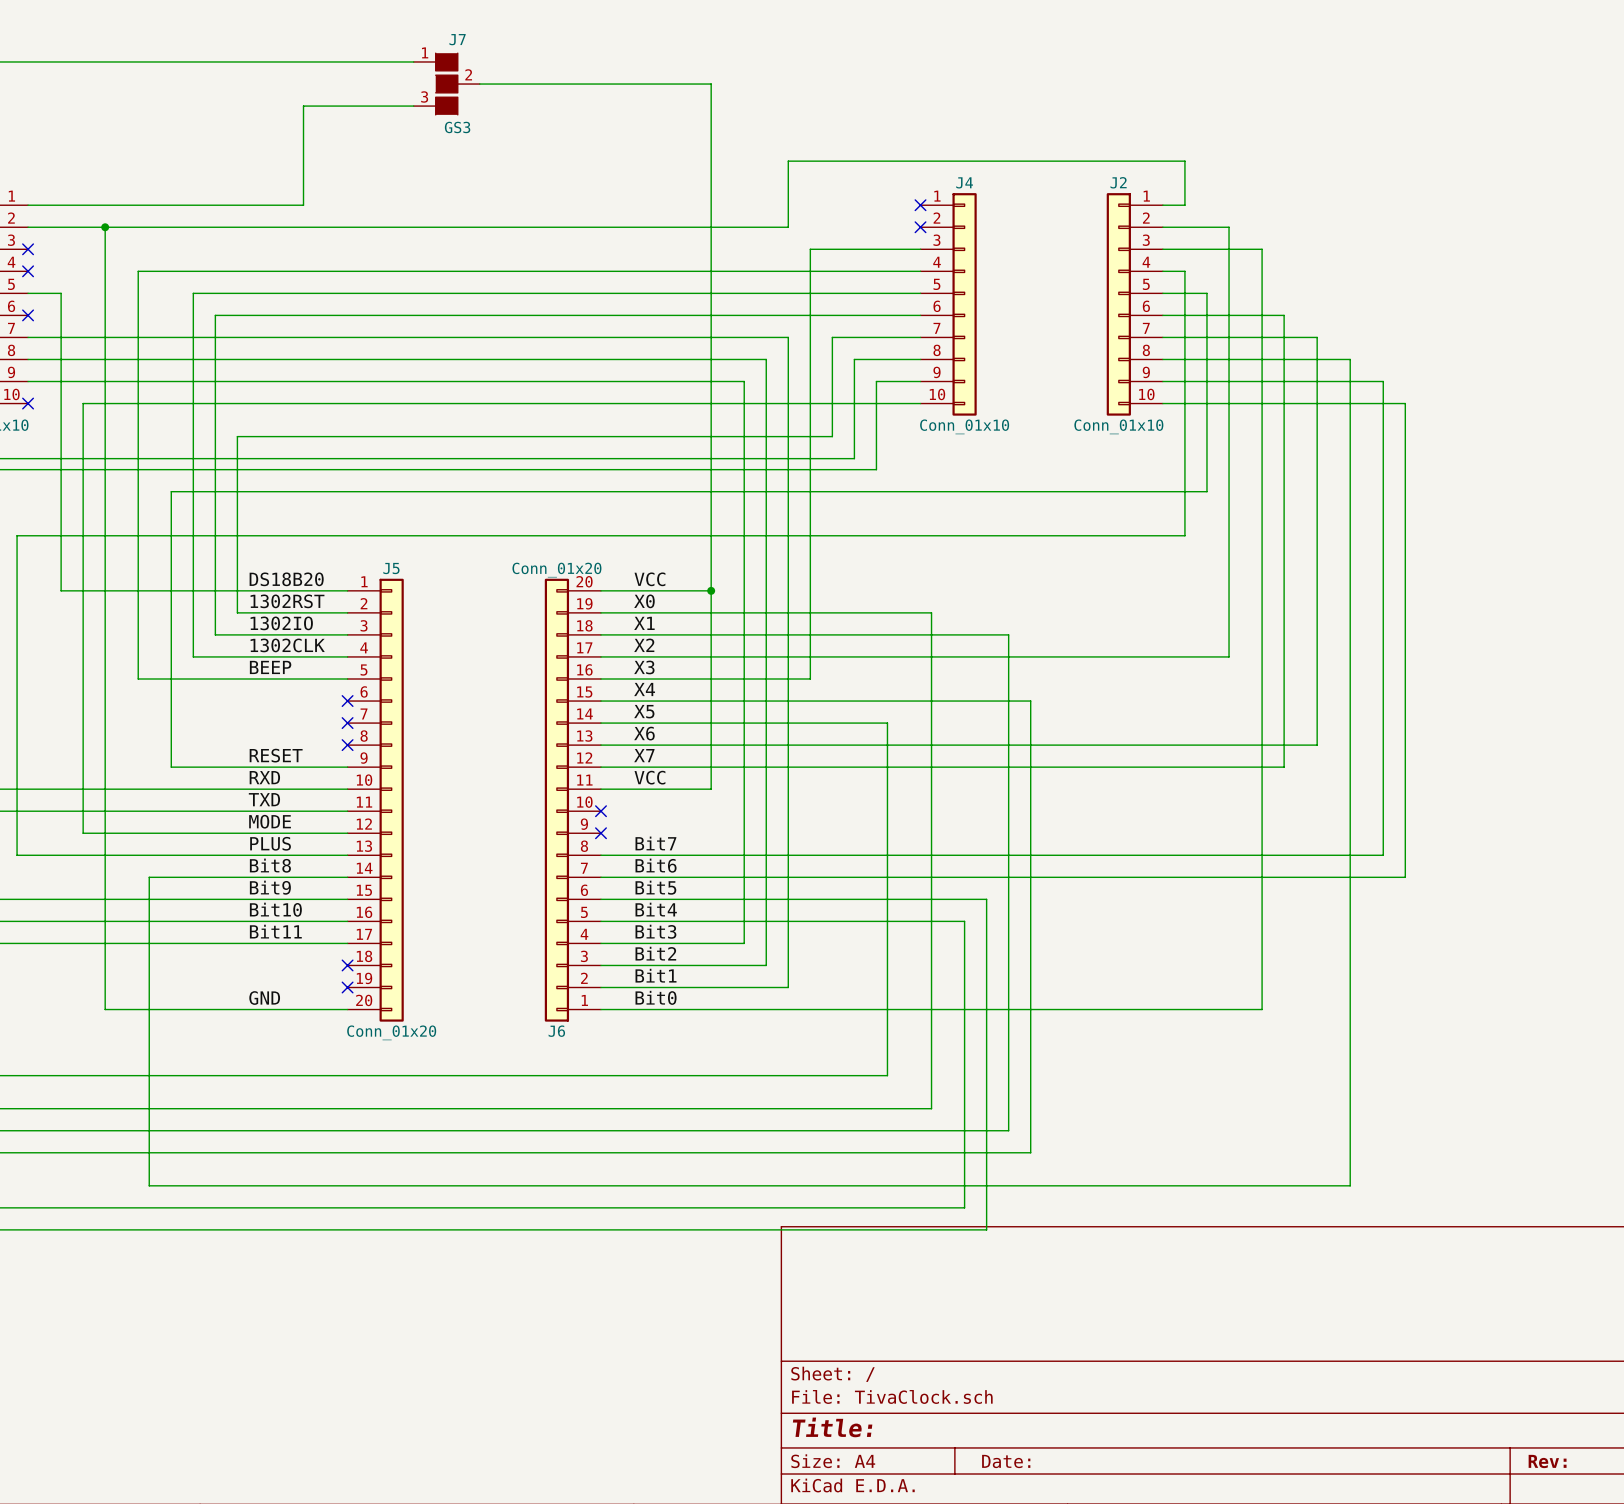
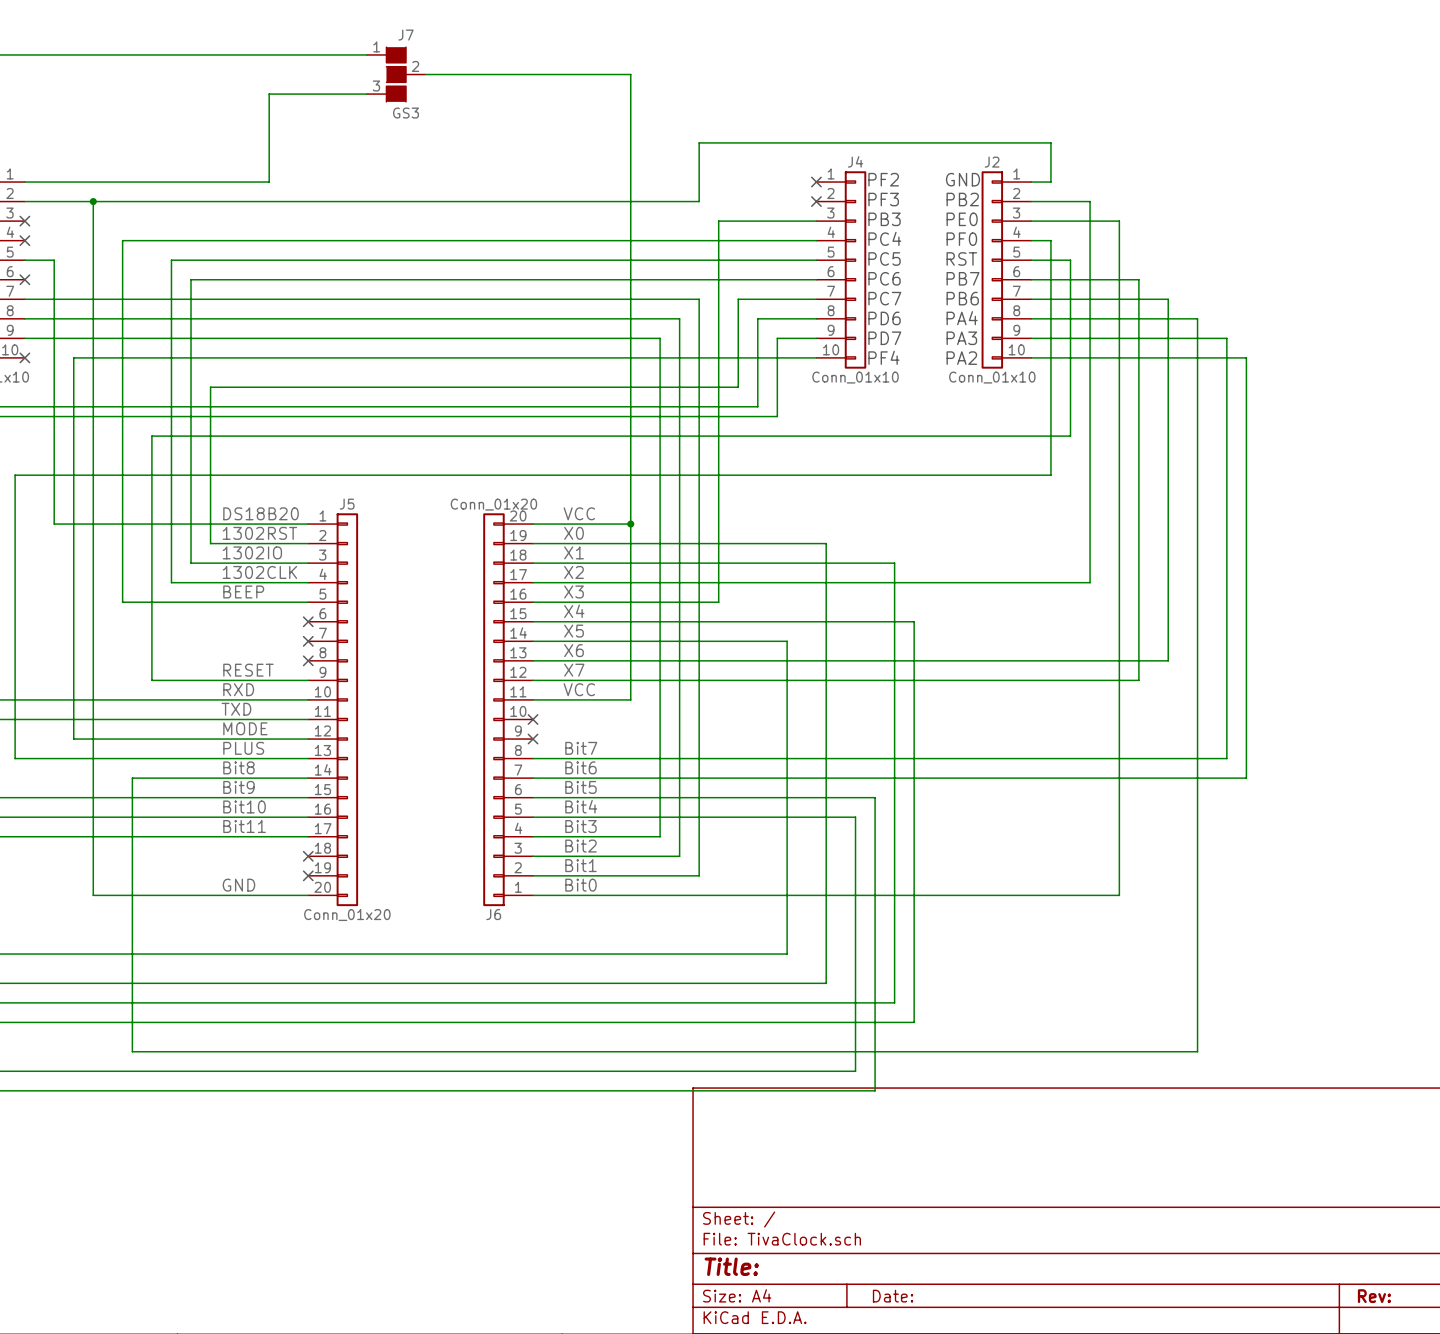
text: none -> PF2 (883, 179)
text: none -> GND (963, 179)
text: none -> PF3 (883, 199)
text: none -> PB2 (962, 199)
text: none -> PB3 (884, 219)
text: none -> PE0 (962, 219)
text: none -> PC4 (884, 238)
text: none -> PF0 (961, 239)
text: none -> PC5 (884, 258)
text: none -> RST (961, 258)
text: none -> PC6 (884, 278)
text: none -> PB7 (963, 278)
text: none -> PC7 (884, 298)
text: none -> PB6 (962, 298)
text: none -> PD6 (884, 318)
text: none -> PA4 (962, 318)
text: none -> PD7 (884, 338)
text: none -> PA3 (961, 338)
text: none -> PF4 (883, 357)
text: none -> PA2 (961, 358)

